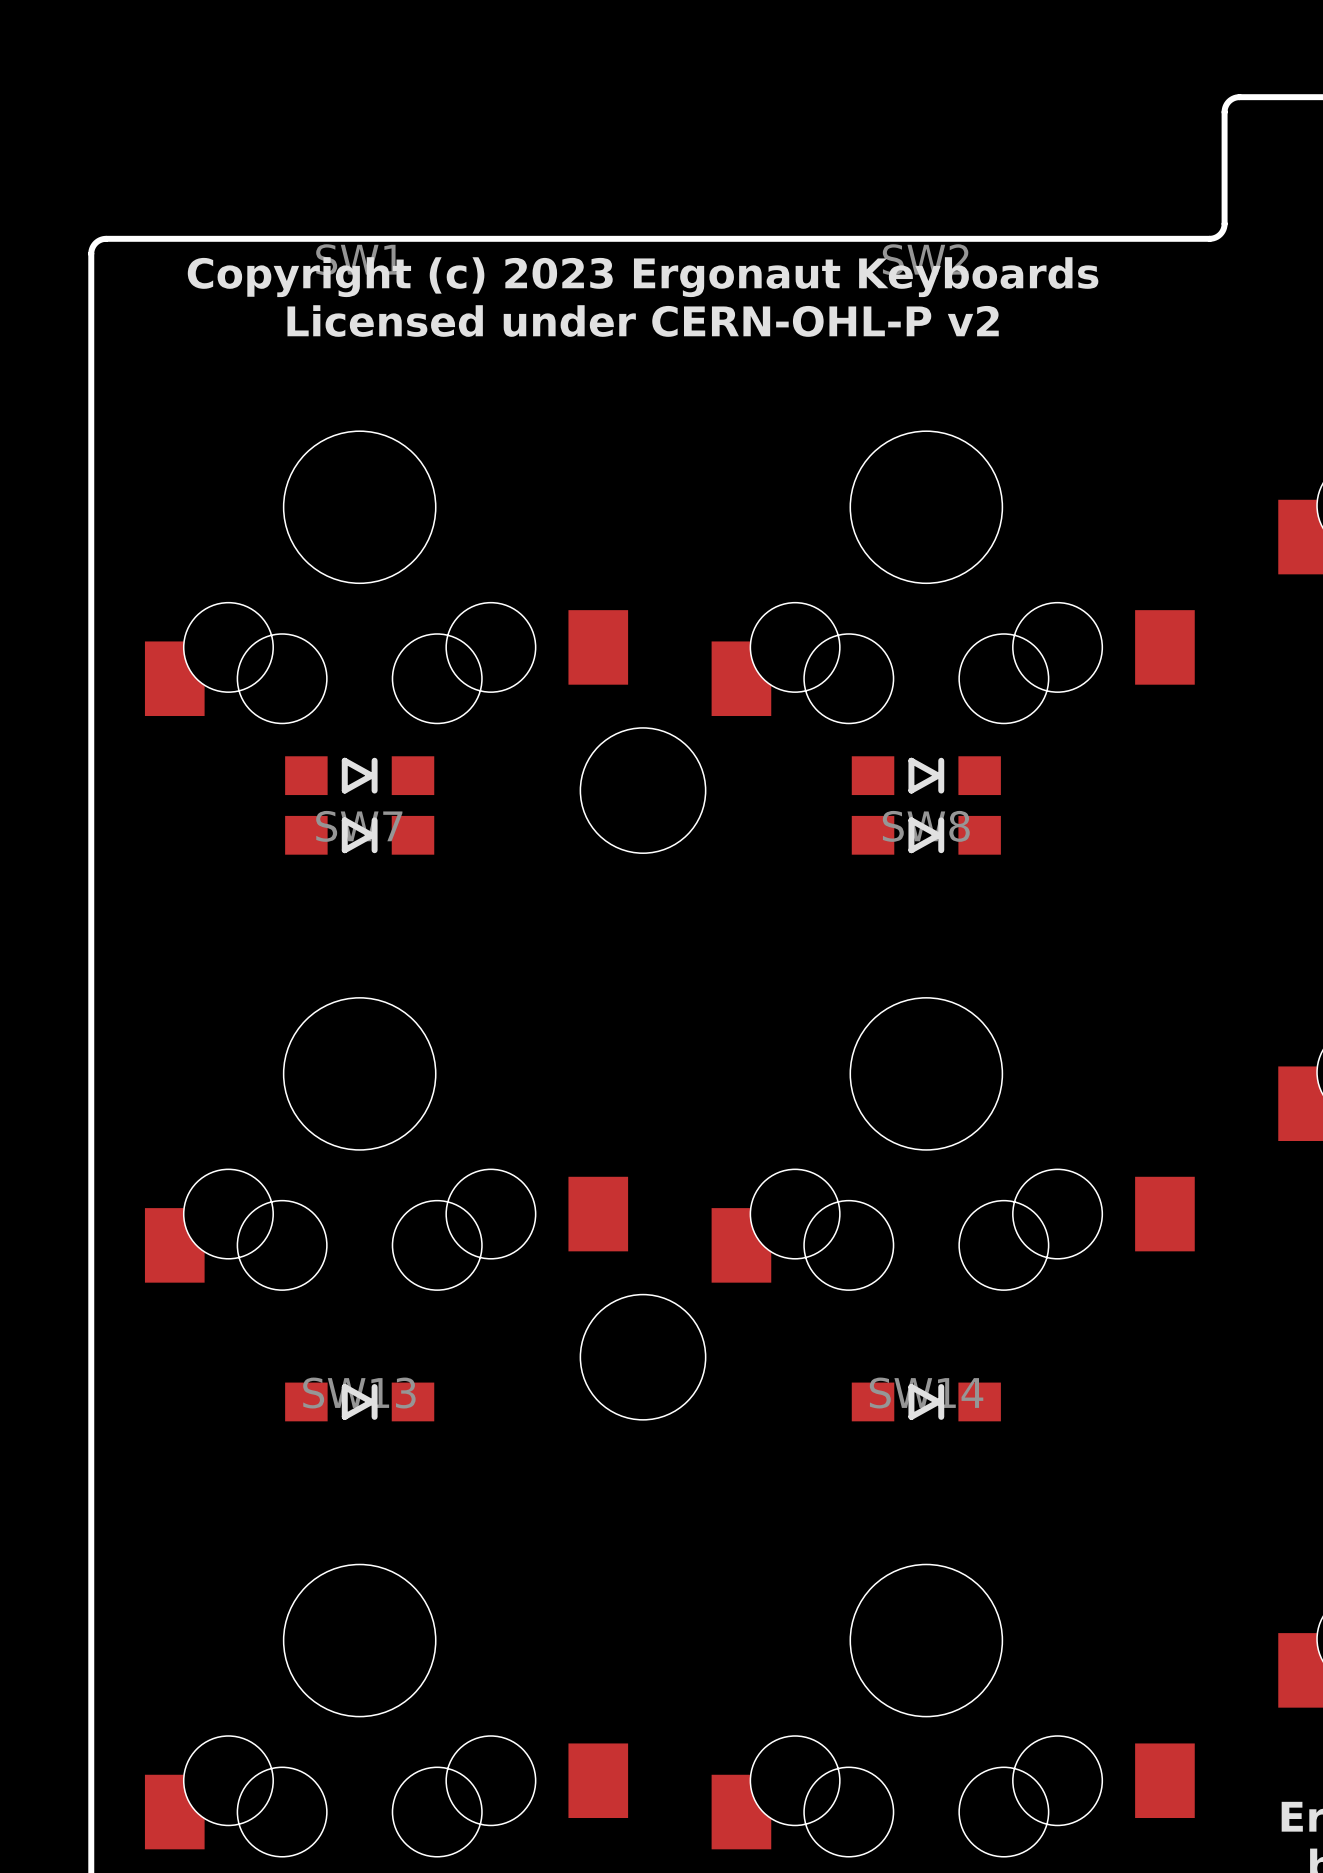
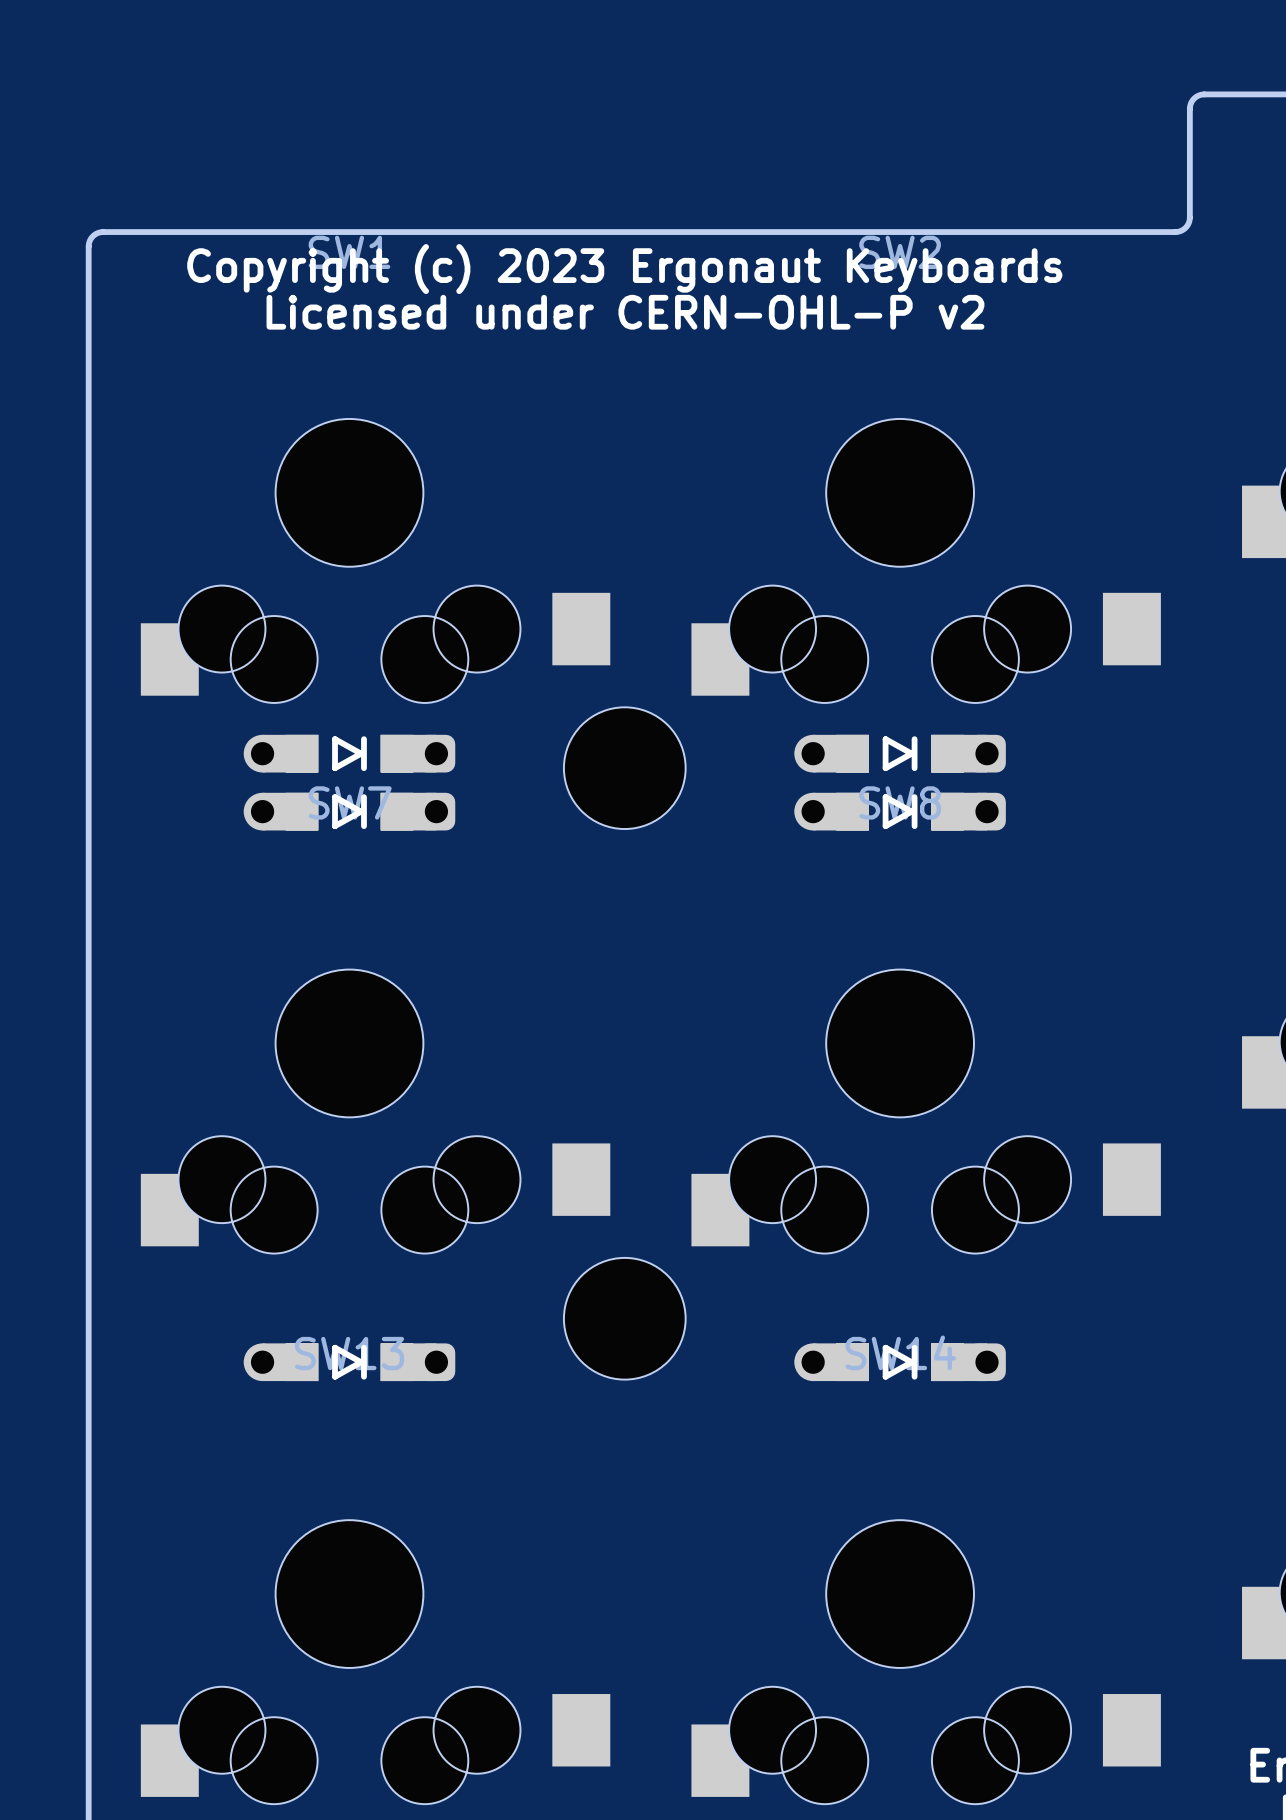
part footprint: [285, 756, 435, 796] -> [243, 734, 456, 773]
part footprint: [851, 756, 1001, 796] -> [794, 734, 1006, 773]
part footprint: [285, 815, 435, 855] -> [243, 792, 456, 831]
part footprint: [851, 815, 1001, 855] -> [794, 792, 1006, 831]
part footprint: [285, 1382, 435, 1422] -> [243, 1343, 456, 1382]
part footprint: [851, 1382, 1001, 1422] -> [794, 1343, 1006, 1382]

